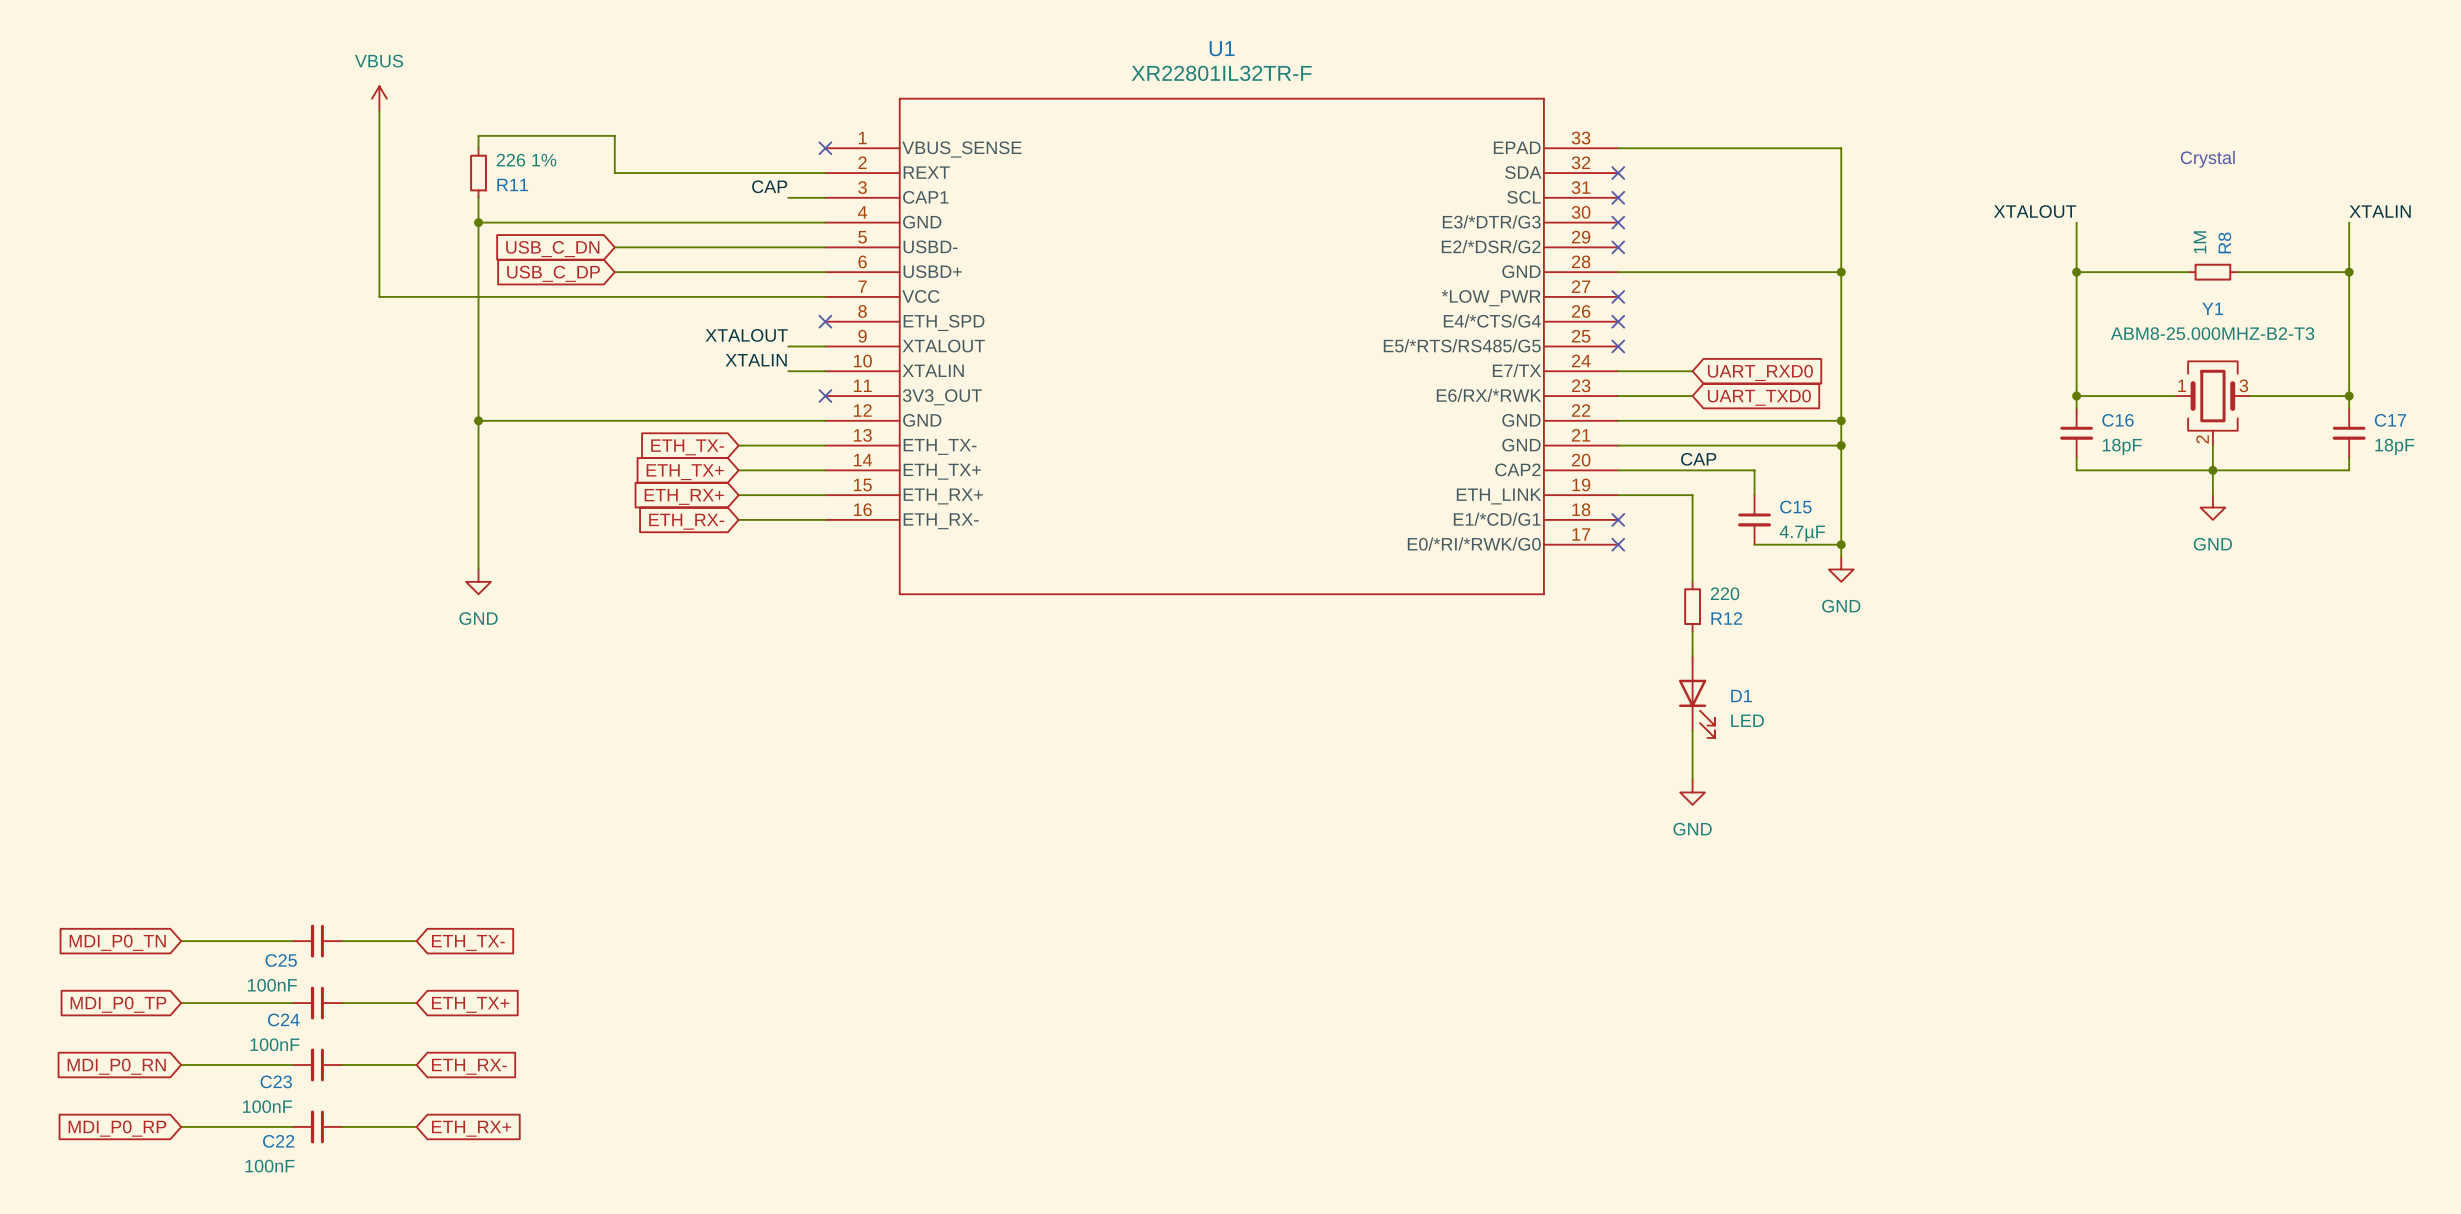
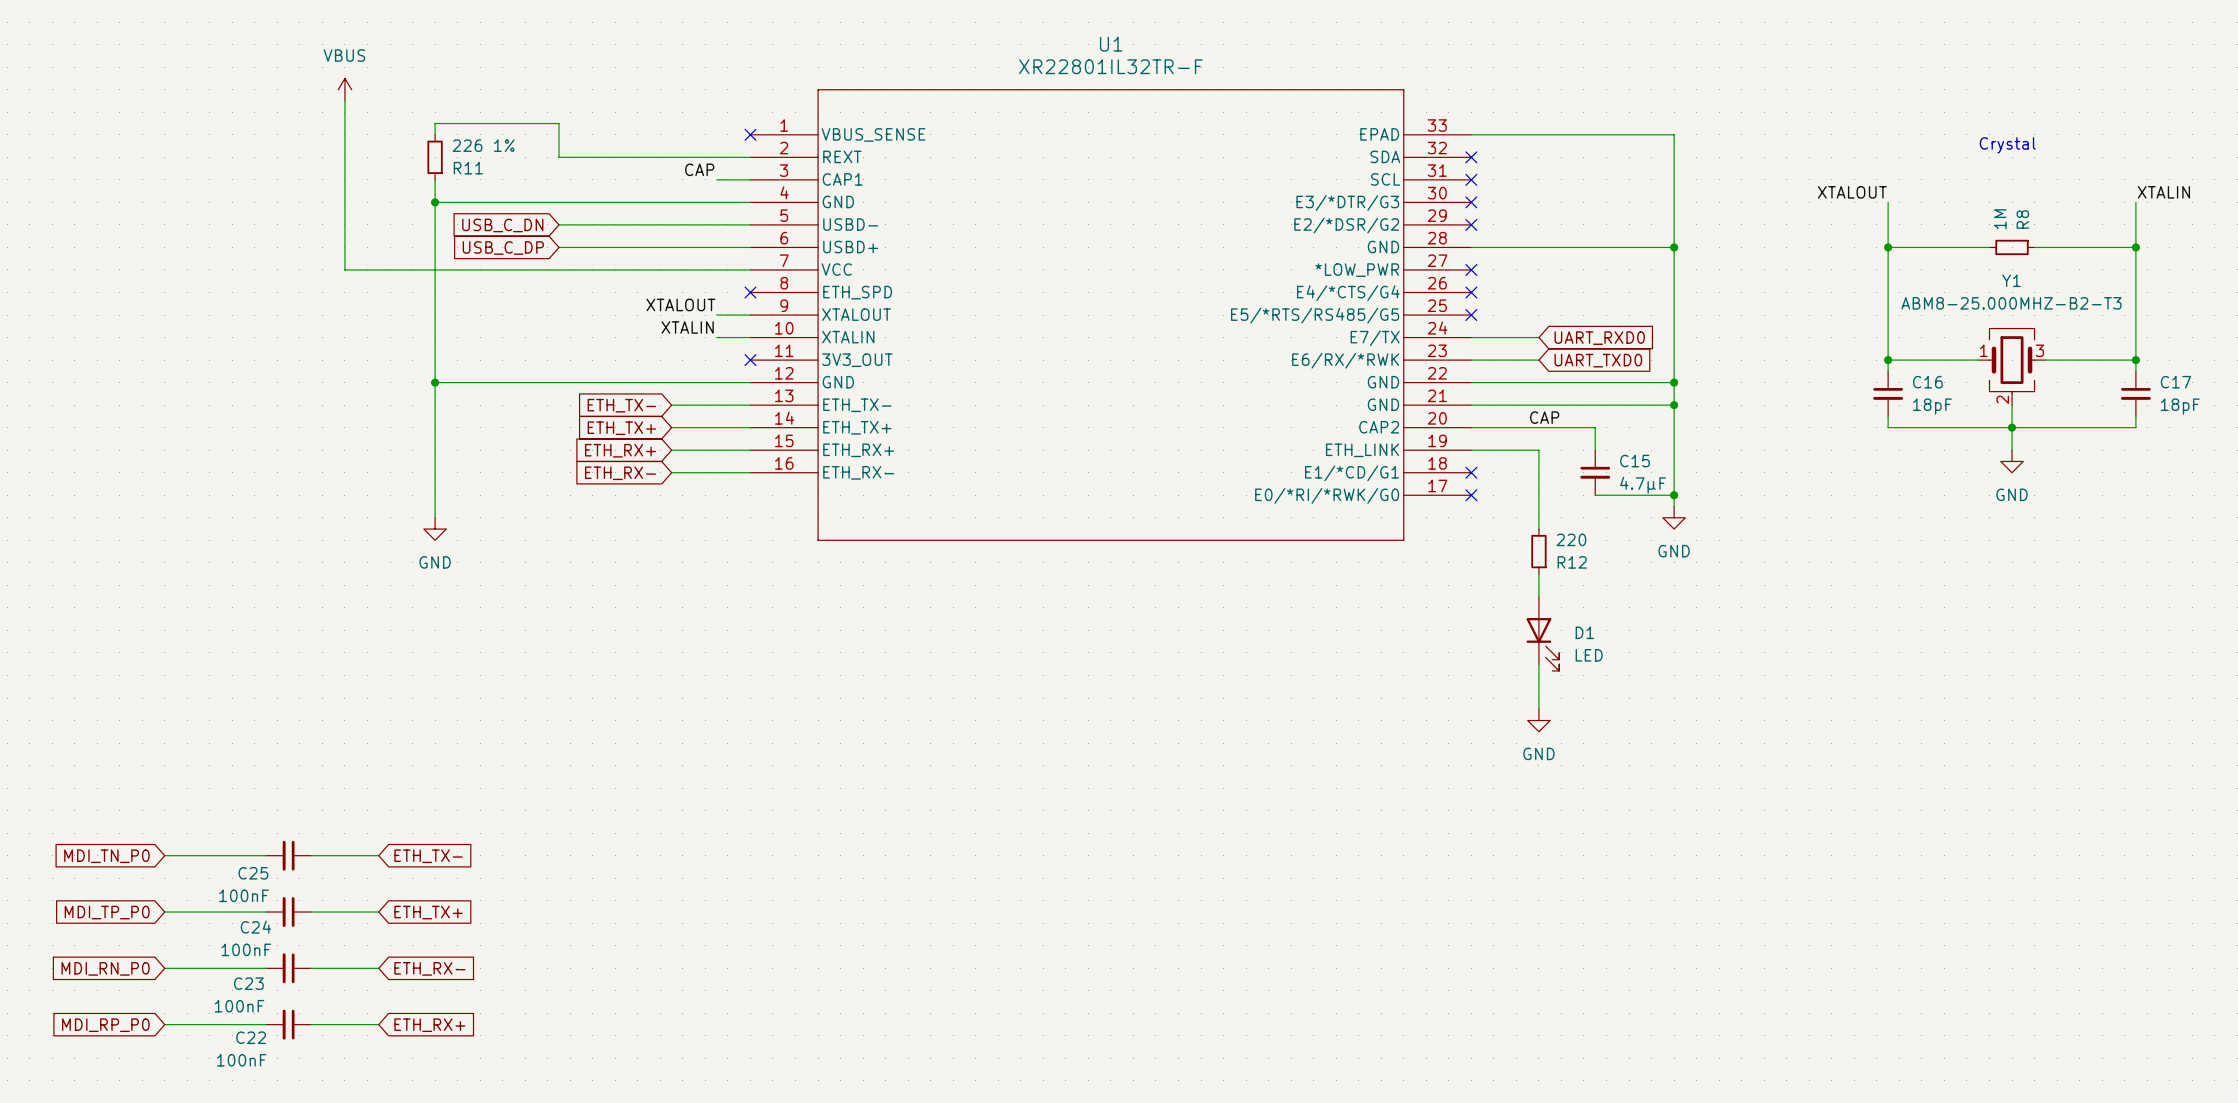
global label: MDI_P0_TN (117, 942) -> MDI_TN_P0 (106, 856)
global label: MDI_P0_TP (118, 1004) -> MDI_TP_P0 (107, 912)
global label: MDI_P0_RN (116, 1066) -> MDI_RN_P0 (105, 968)
global label: MDI_P0_RP (117, 1128) -> MDI_RP_P0 (105, 1025)

